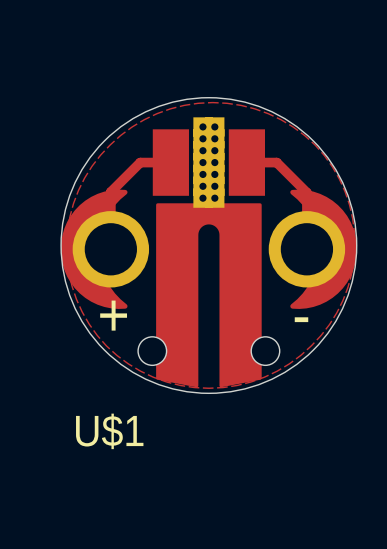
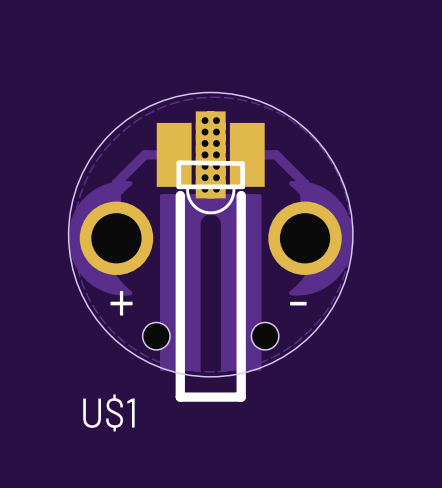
U$1 footprint: [152, 117, 266, 388] -> [156, 111, 265, 402]

